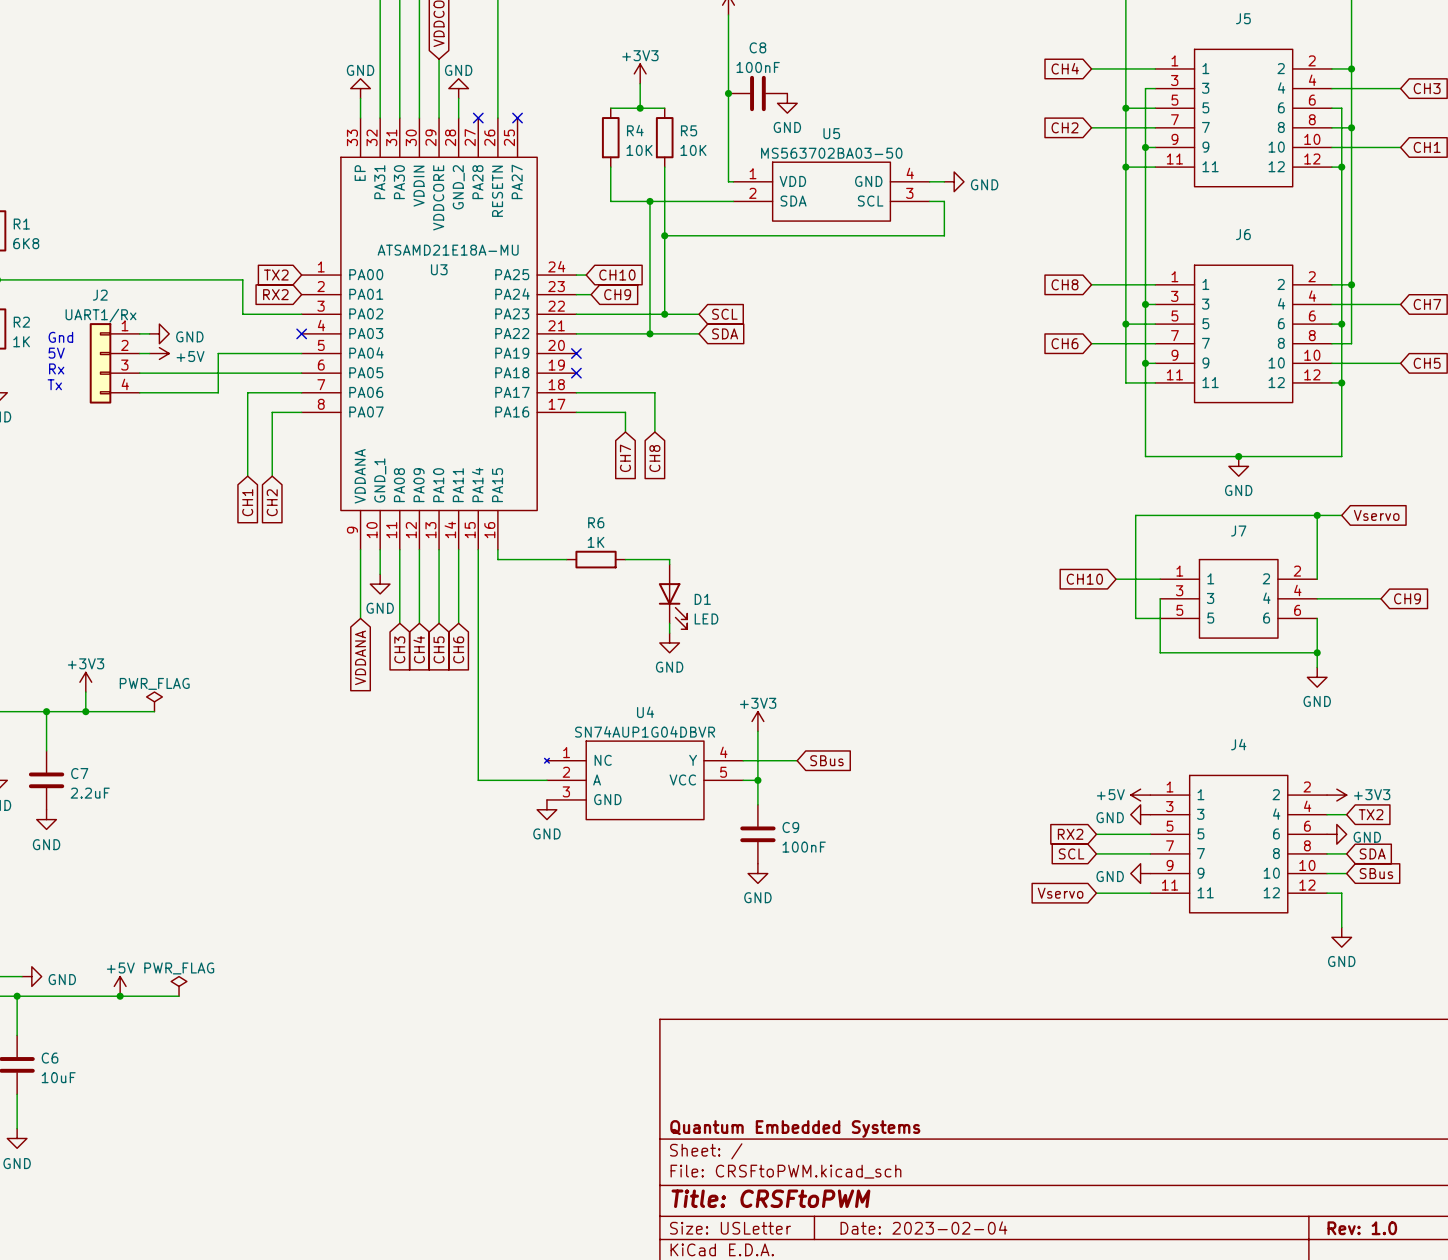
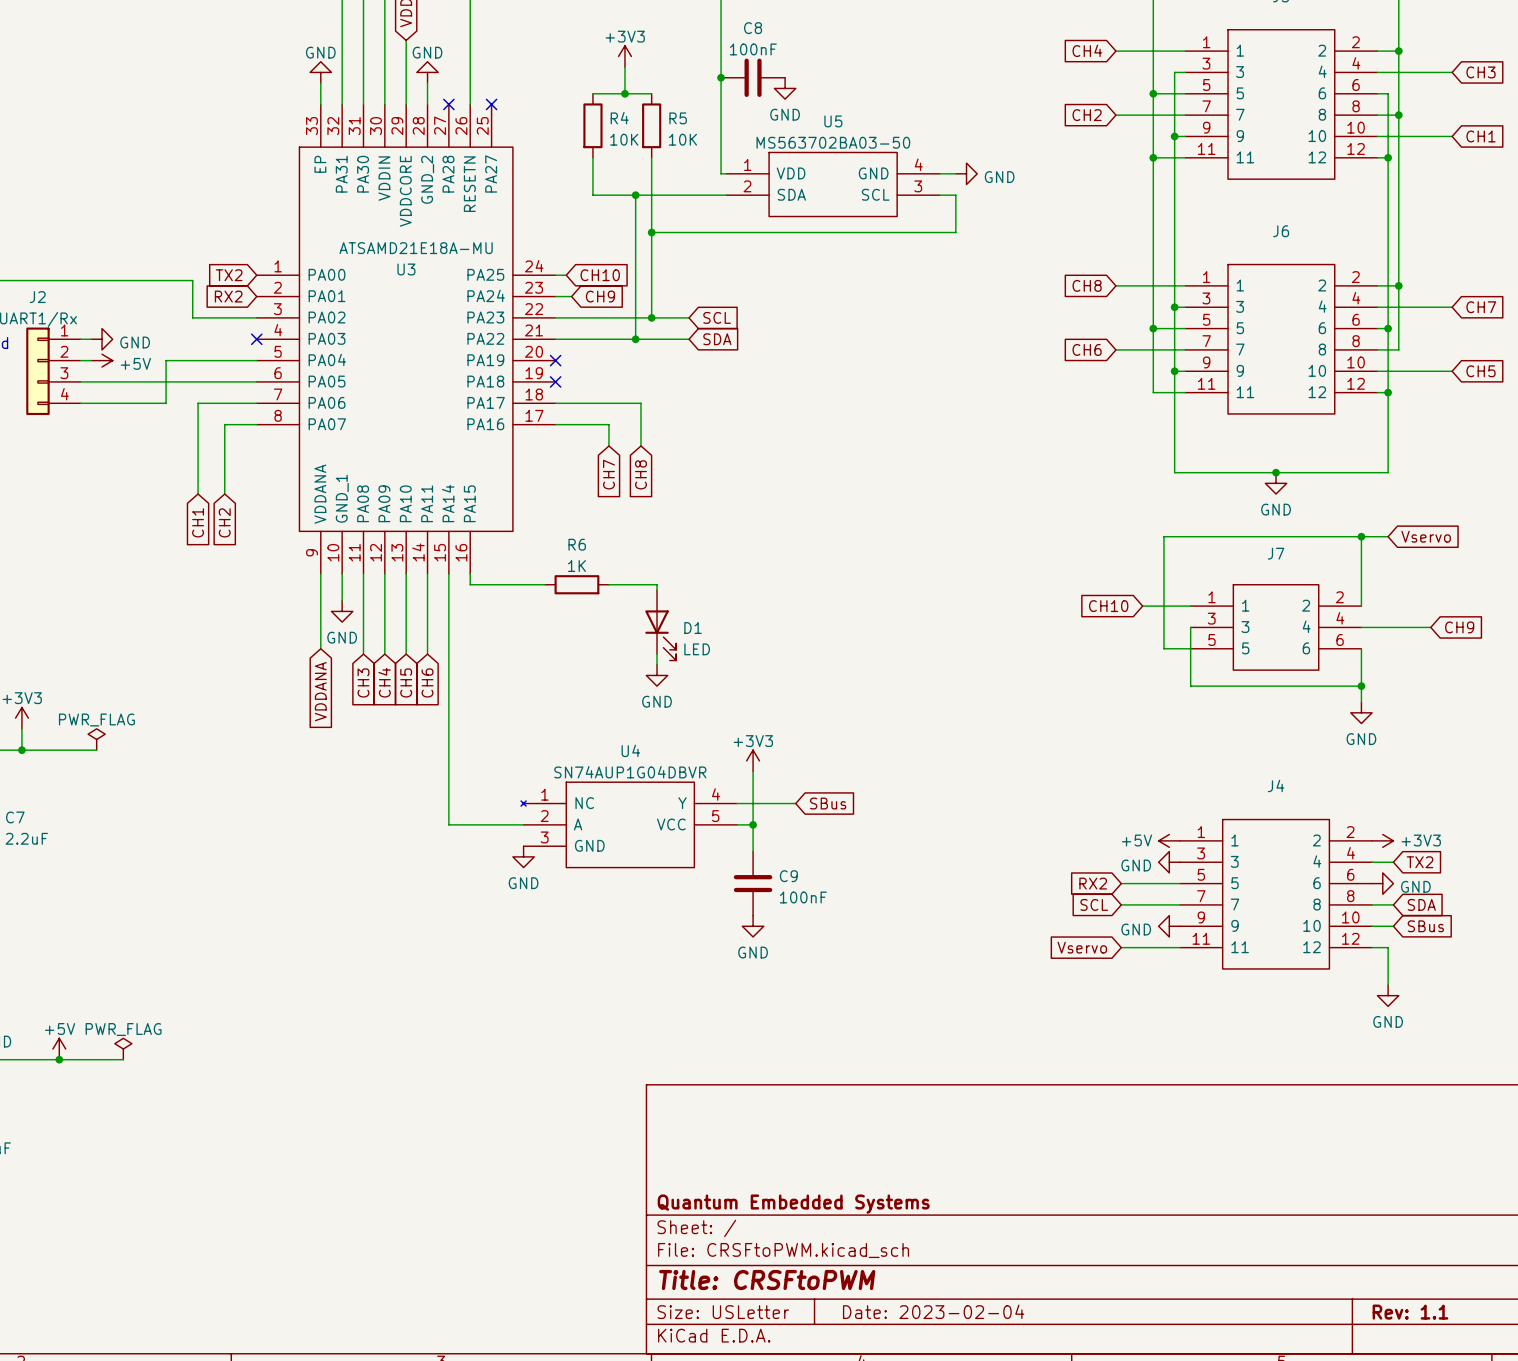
title block: Rev: 1.0 (1362, 1228) -> Rev: 1.1 (1410, 1312)

